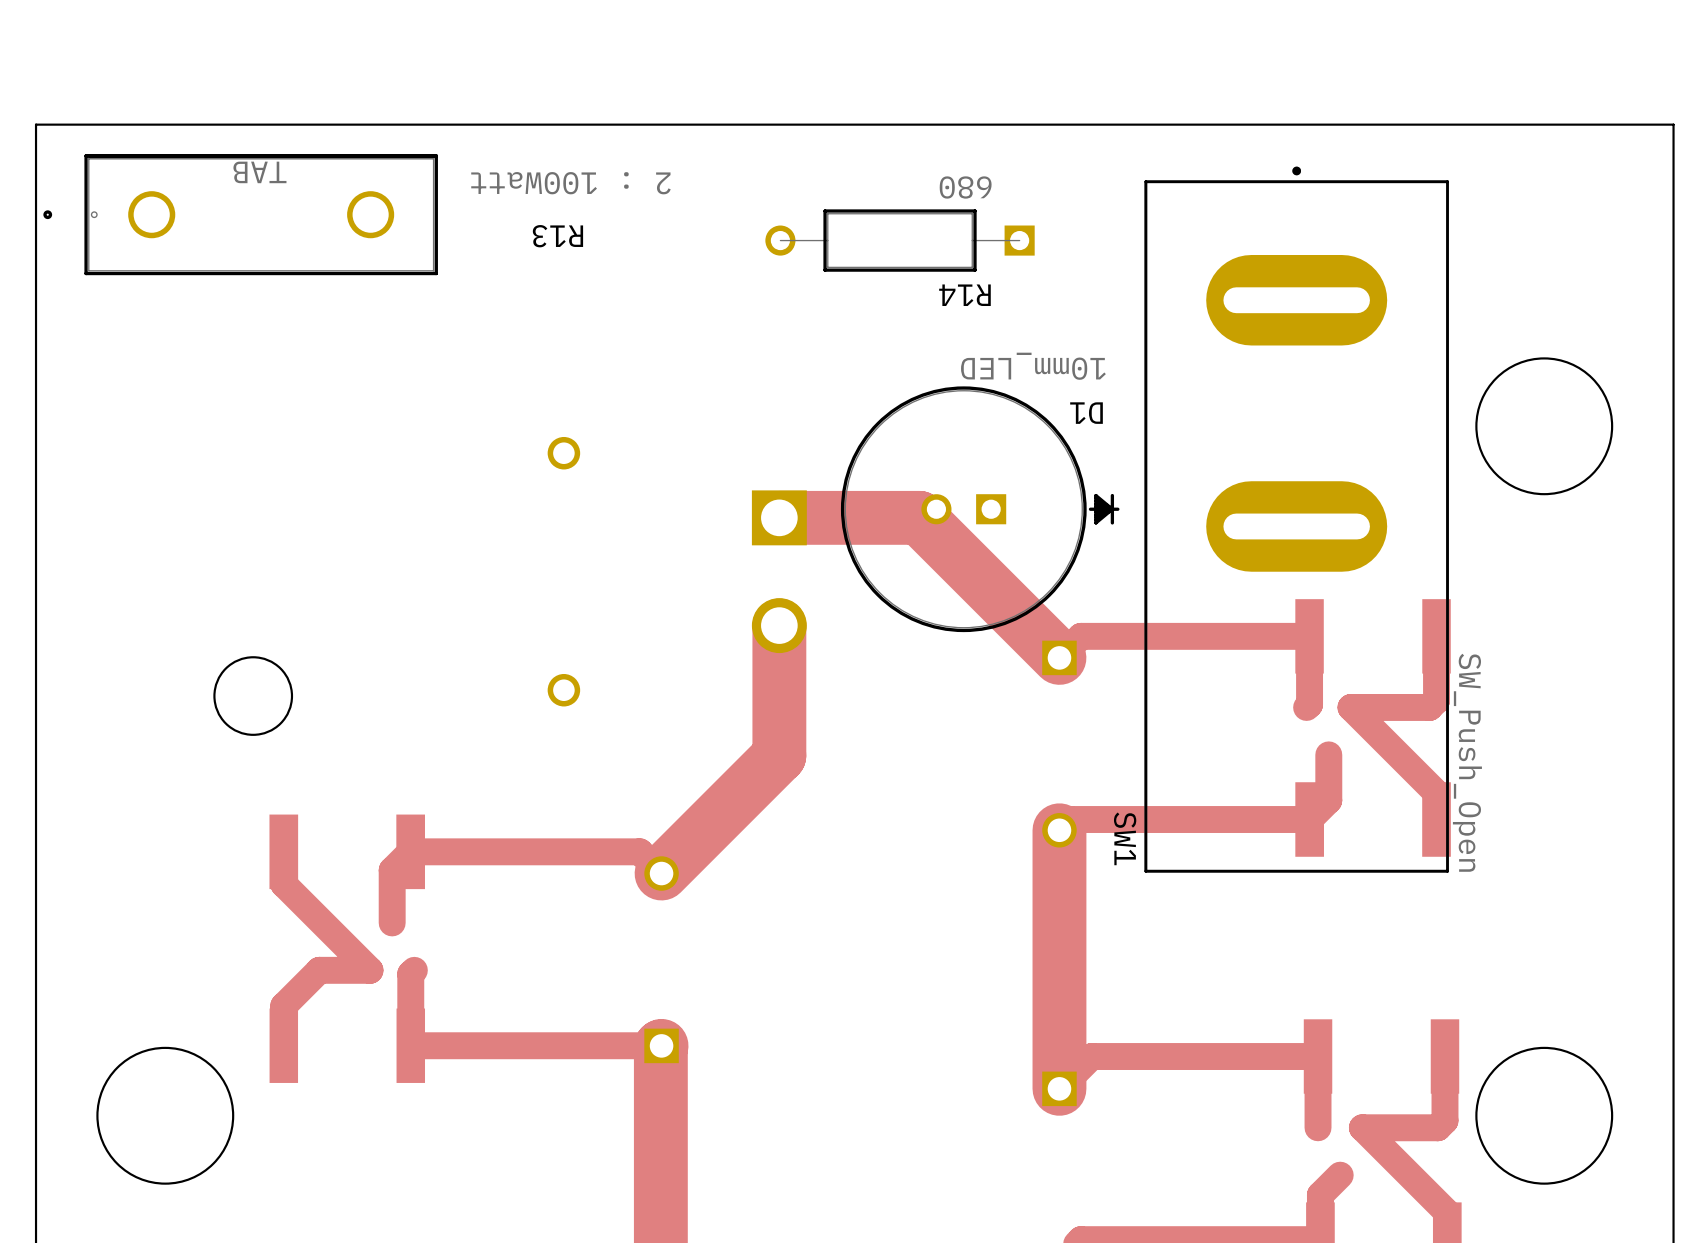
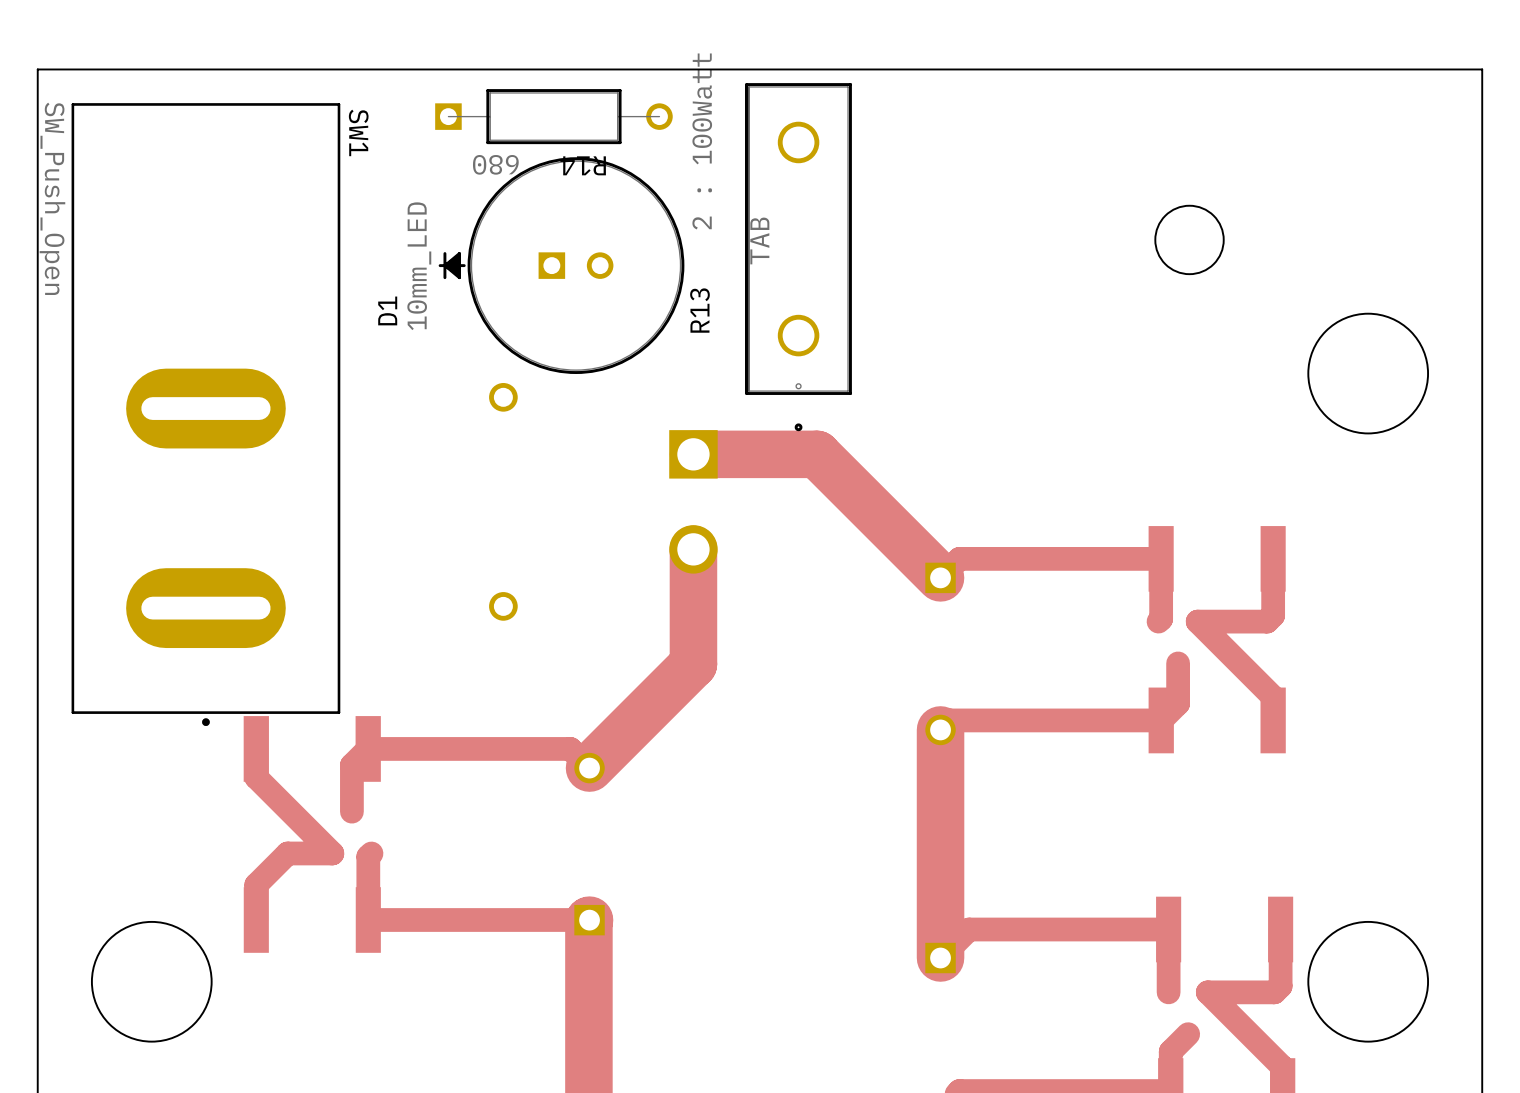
board edge: (1673, 124) (36, 124) -> (1482, 107) (1482, 69) (37, 69) (37, 107)
R13 value position: 2 : 100Watt (570, 183) -> 2 : 100Watt (702, 141)
R13 rotation: 0° (240, 214) -> 90° counterclockwise (798, 257)
R13 position: (240, 214) -> (798, 257)
round board edge: none -> [1154, 204, 1225, 276]
R13 name position: R13 (557, 236) -> R13 (699, 310)
R14 rotation: 0° (900, 240) -> 180° (553, 116)
R14 position: (900, 240) -> (553, 116)
D1 value position: 10mm_LED (1033, 366) -> 10mm_LED (419, 266)
D1 name position: D1 (1086, 413) -> D1 (387, 310)
D1 rotation: 0° (980, 509) -> 180° (561, 265)
D1 position: (980, 509) -> (561, 265)
SW1 rotation: 0° (1296, 519) -> 180° (205, 414)
SW1 position: (1296, 519) -> (205, 414)
round board edge: [213, 656, 294, 736] -> none

